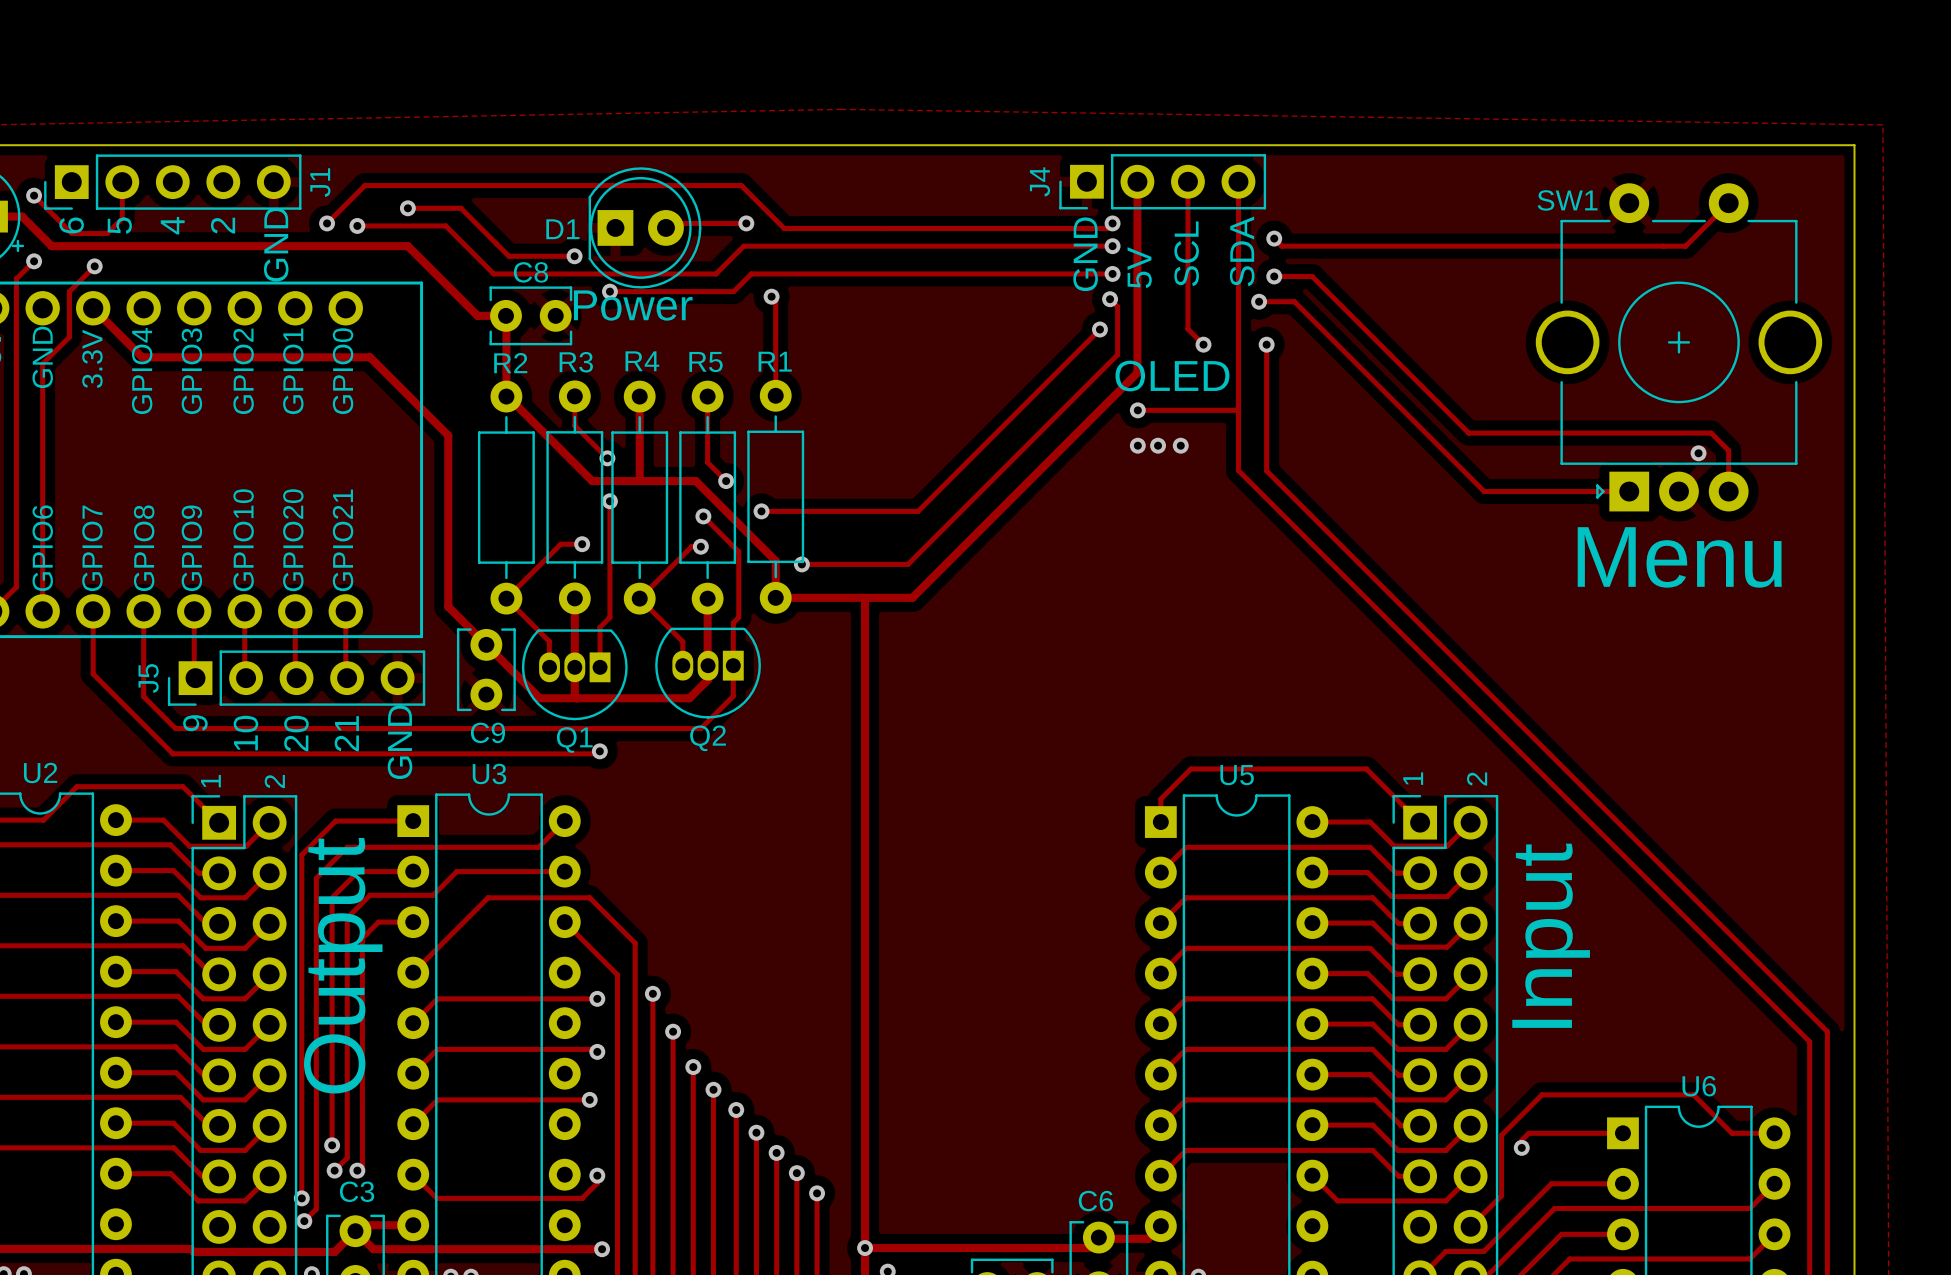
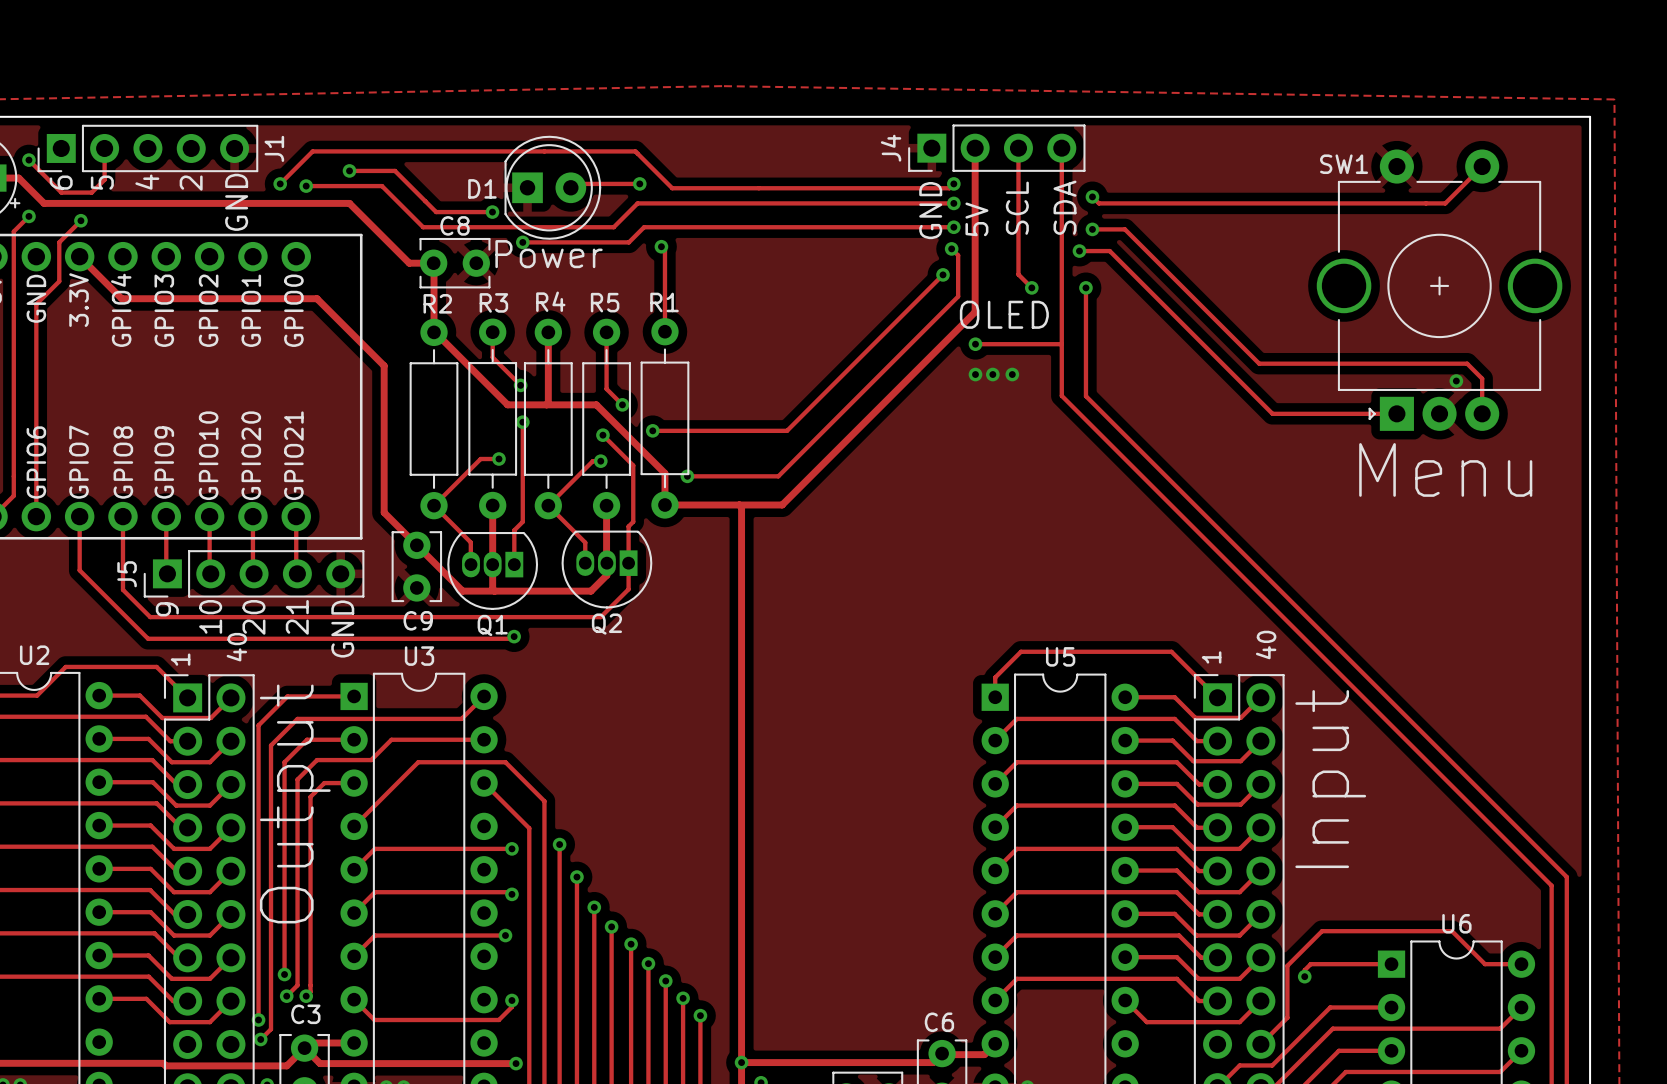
text: 2 (1477, 779) -> 40 (1266, 645)
text: 2 (274, 781) -> 40 (236, 647)

